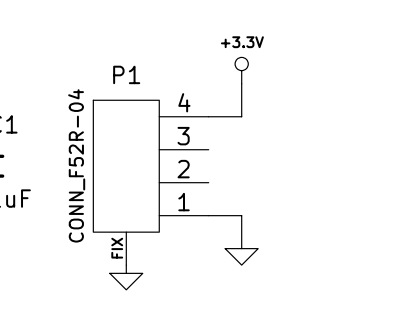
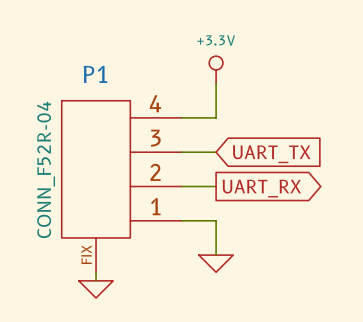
wire: none -> (181, 152) (216, 152)
global label: none -> UART_TX (271, 154)
wire: none -> (181, 186) (216, 186)
global label: none -> UART_RX (261, 188)

